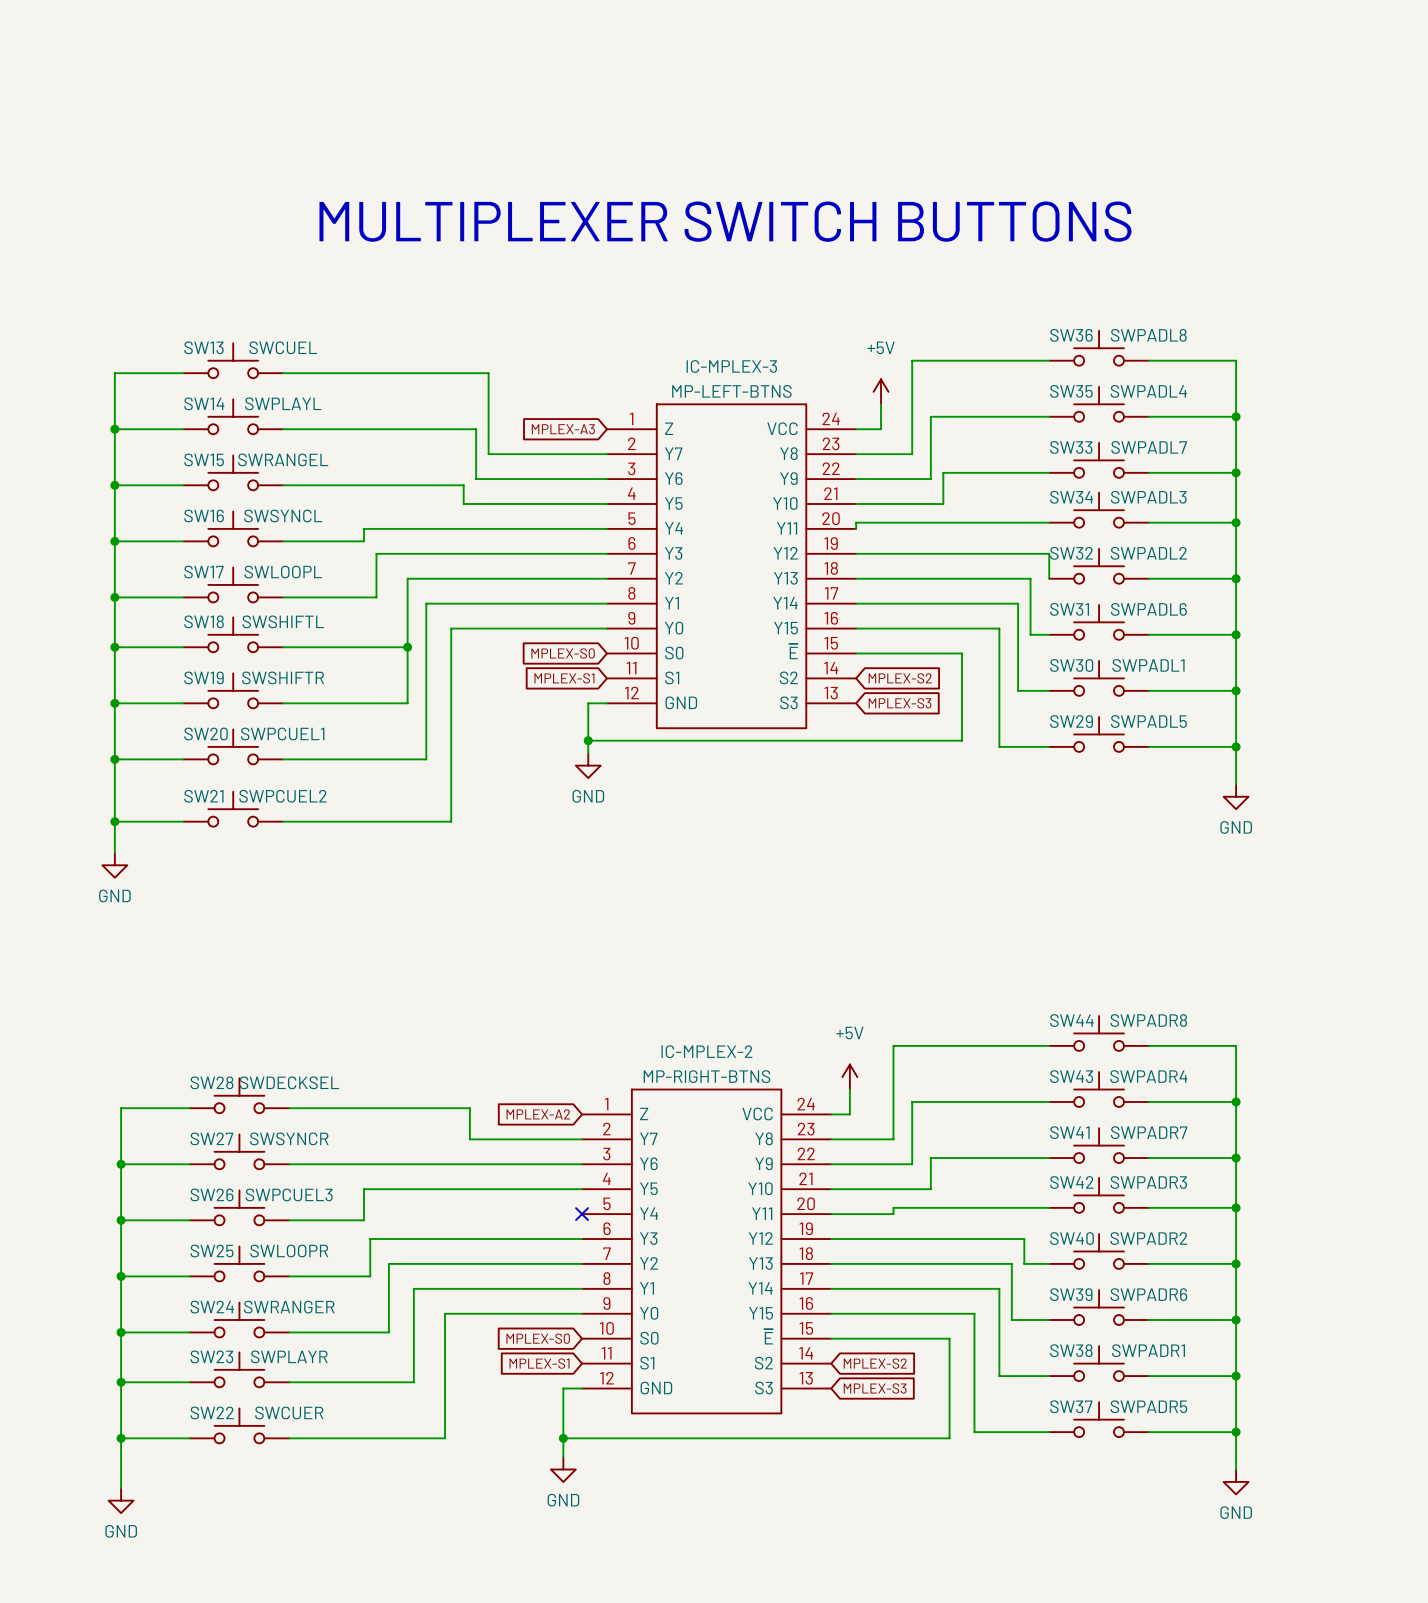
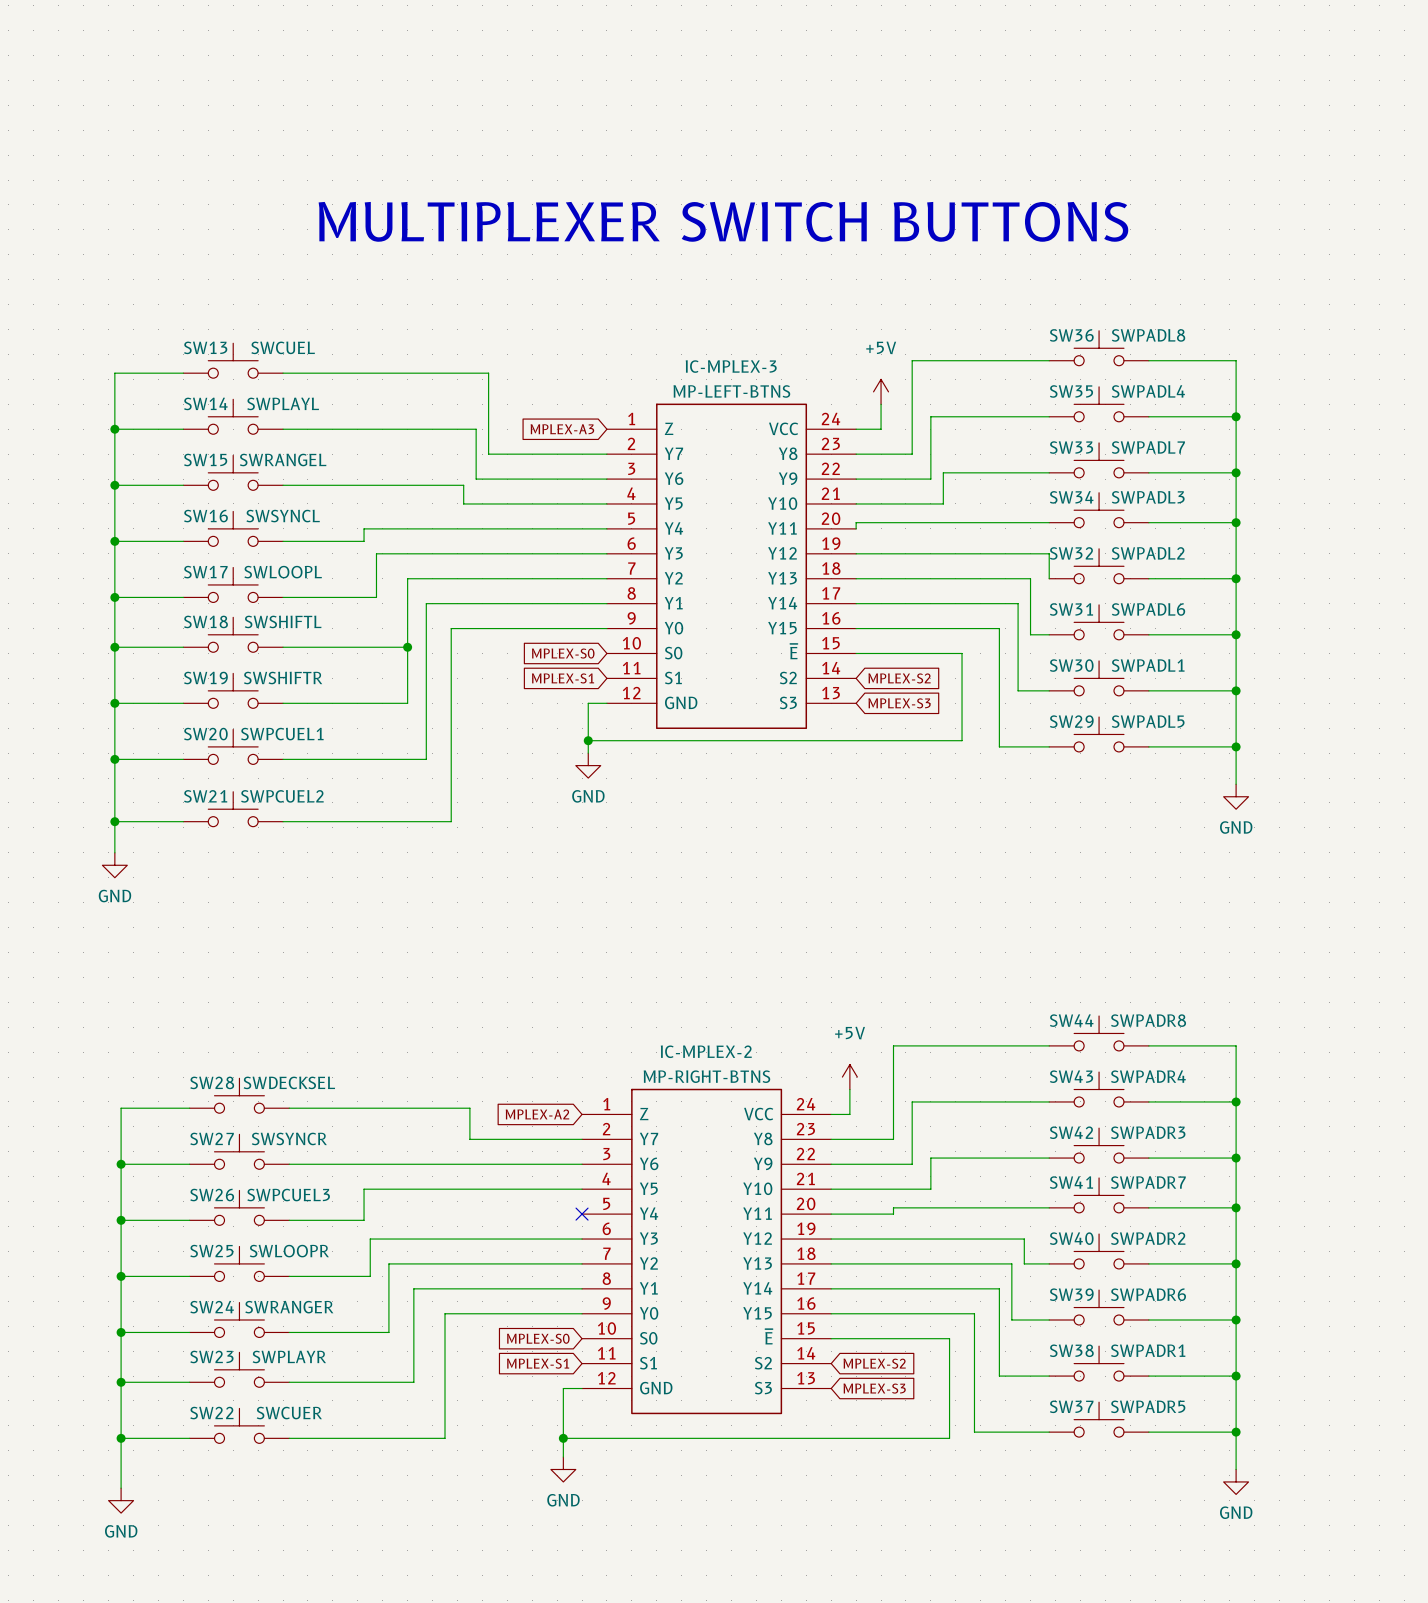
SW41 name: SW41 (1069, 1132) -> SW42 (1071, 1132)
SW41 value: SWPADR7 (1149, 1132) -> SWPADR3 (1148, 1132)
SW42 name: SW42 (1071, 1182) -> SW41 (1071, 1182)
SW42 value: SWPADR3 (1148, 1182) -> SWPADR7 (1148, 1182)

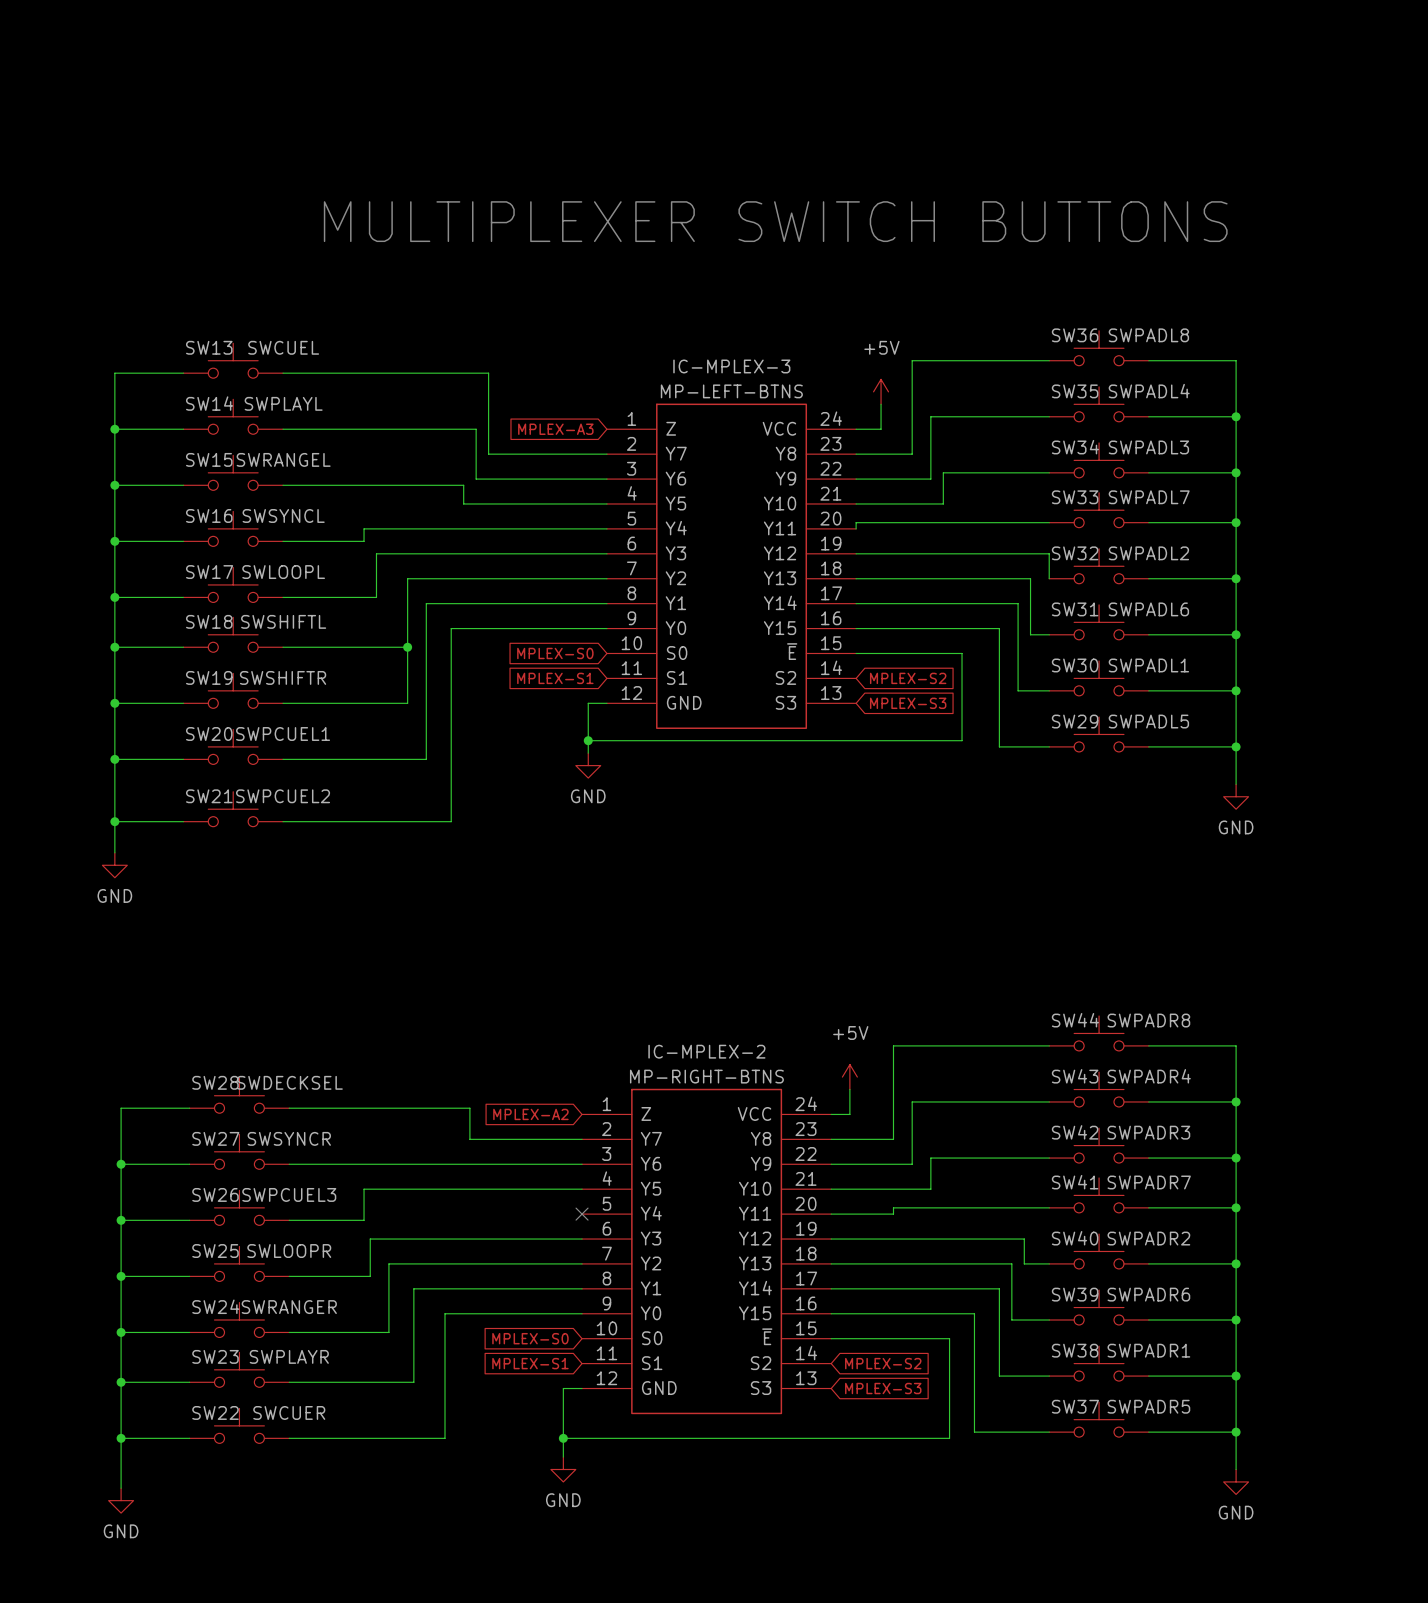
SW33 name: SW33 (1071, 447) -> SW34 (1075, 447)
SW33 value: SWPADL7 (1148, 447) -> SWPADL3 (1148, 447)
SW34 name: SW34 (1071, 497) -> SW33 (1075, 497)
SW34 value: SWPADL3 (1148, 497) -> SWPADL7 (1149, 497)

